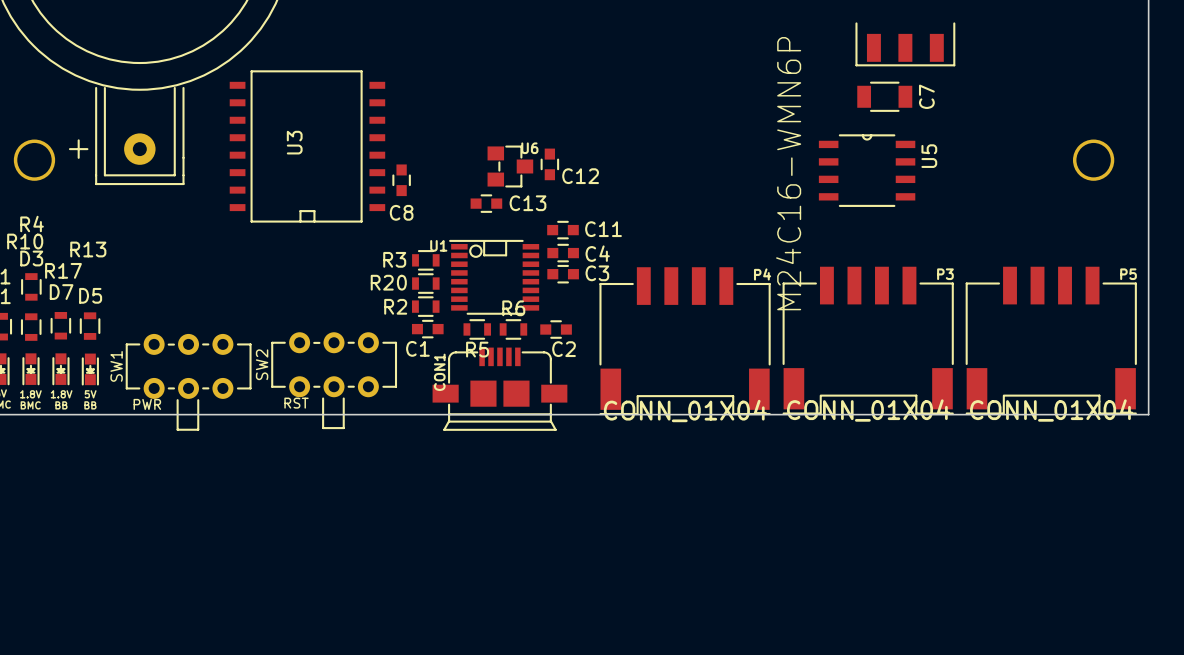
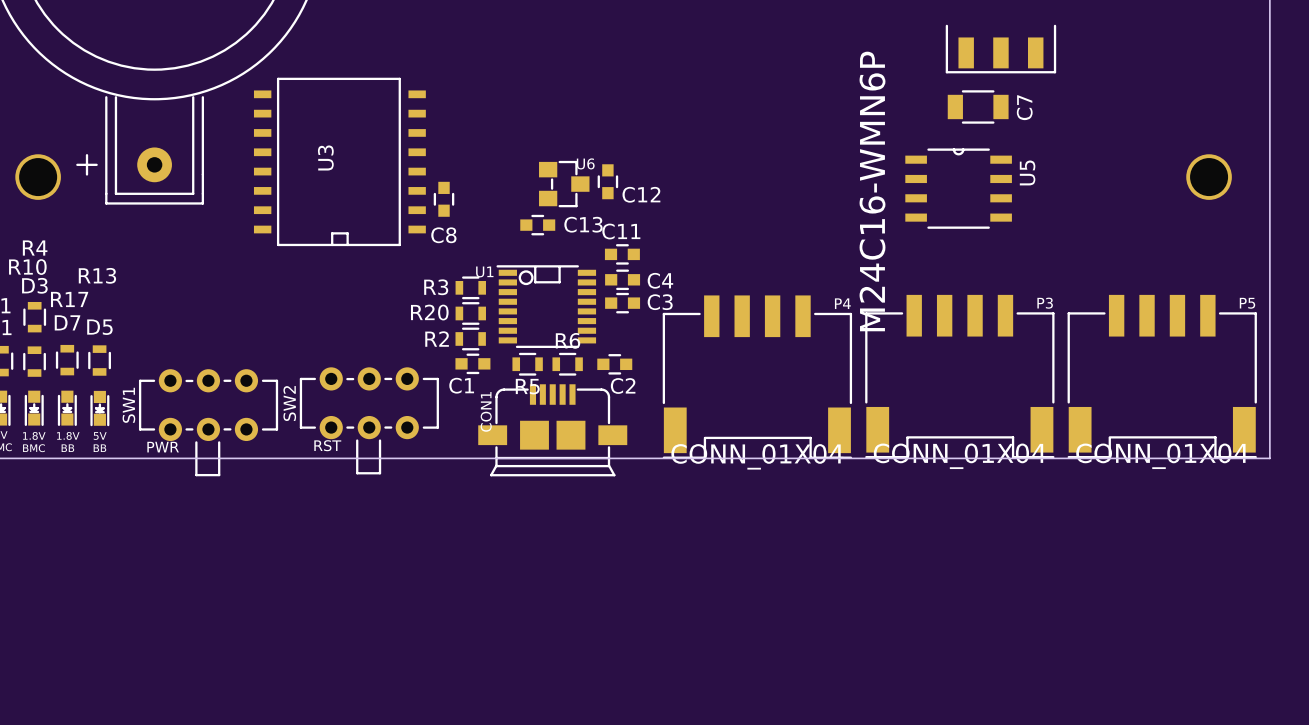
C11 name position: C11 (603, 229) -> C11 (621, 231)

